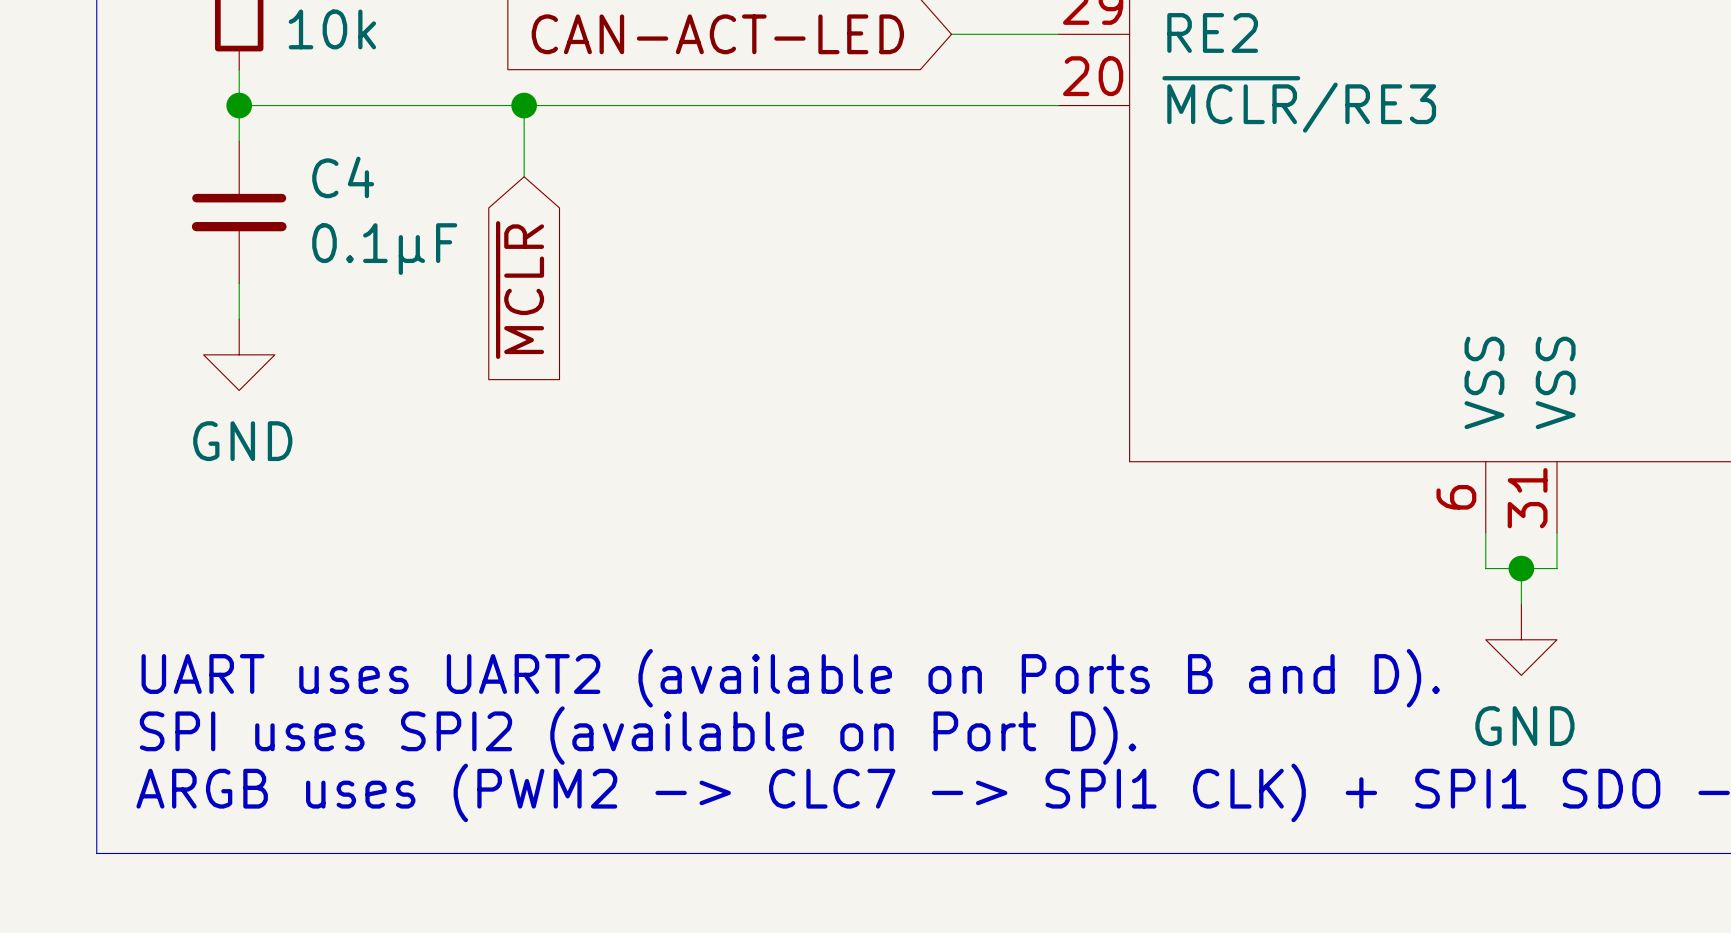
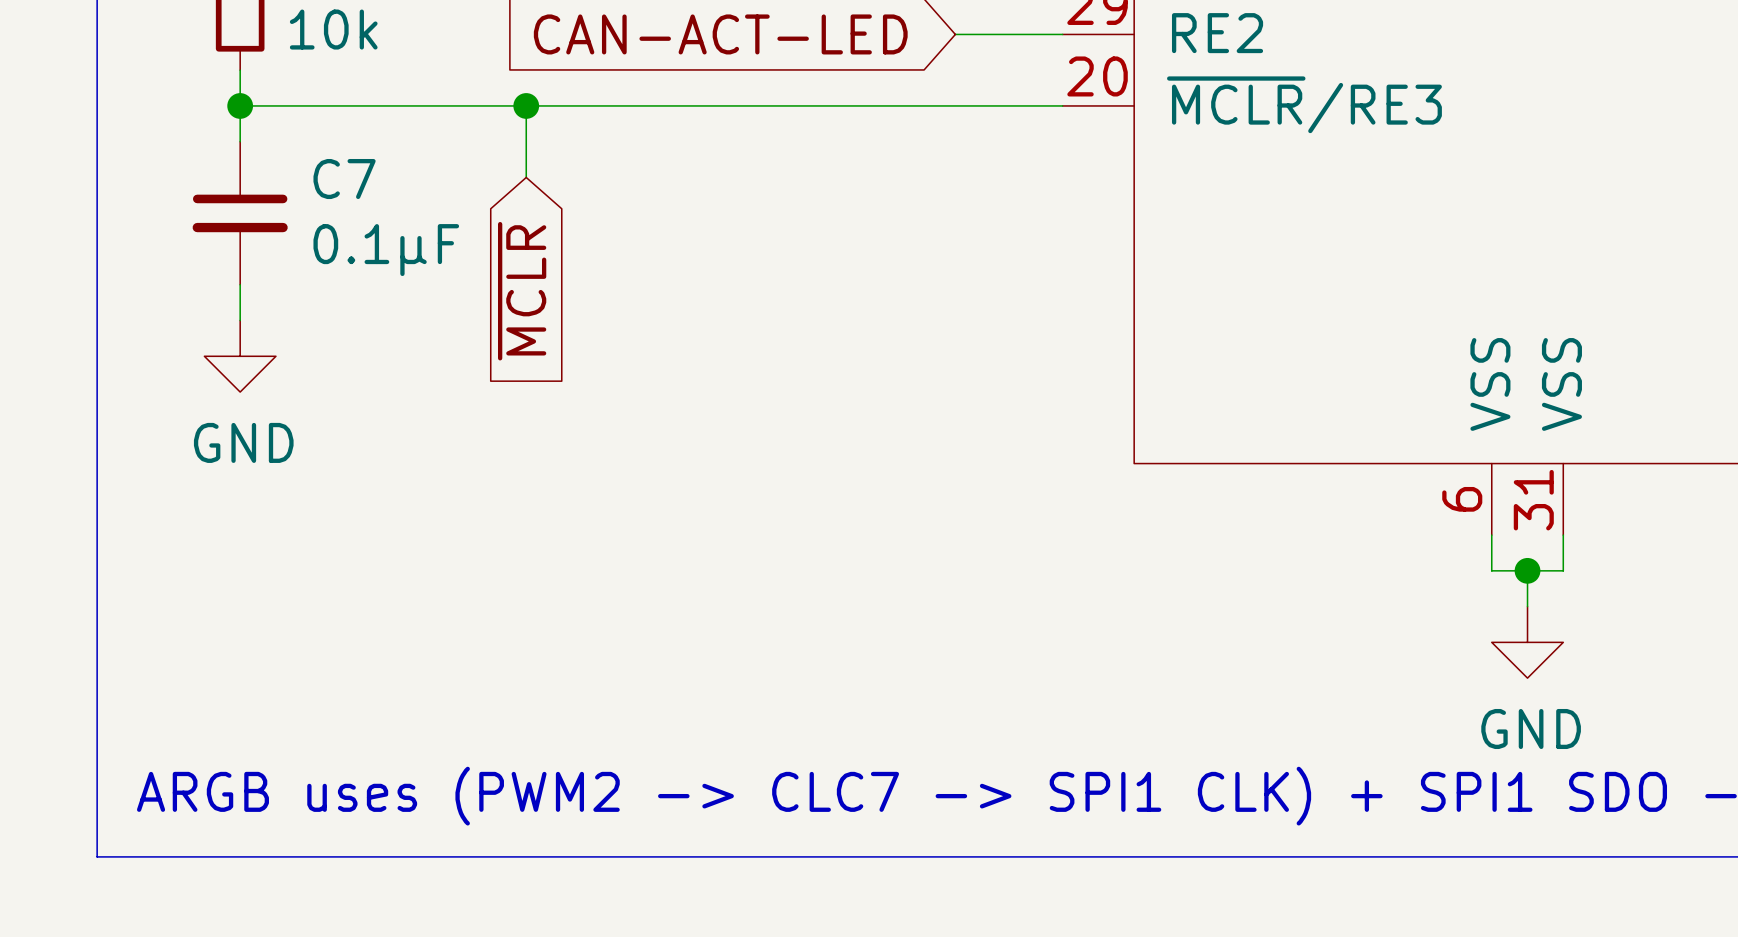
C4 name: C4 (343, 177) -> C7 (344, 179)
text: UART uses UART2 (available on Ports B and D). (790, 678) -> none
text: SPI uses SPI2 (available on Port D). (638, 735) -> none

